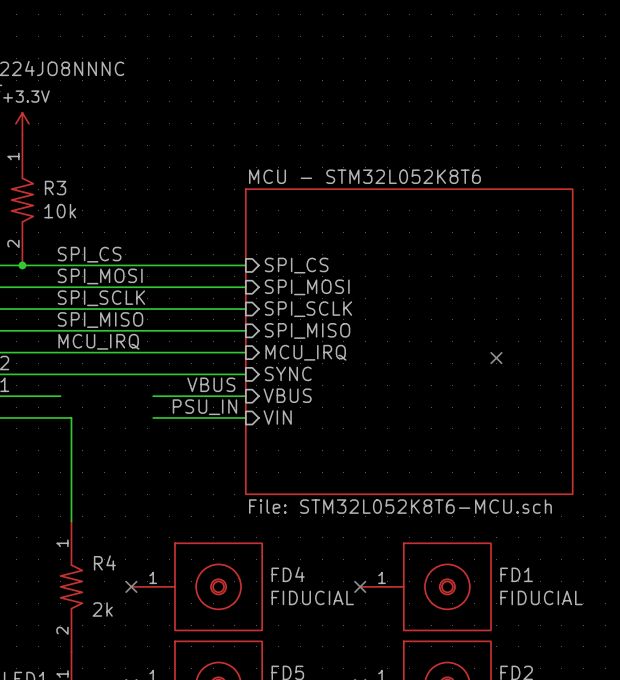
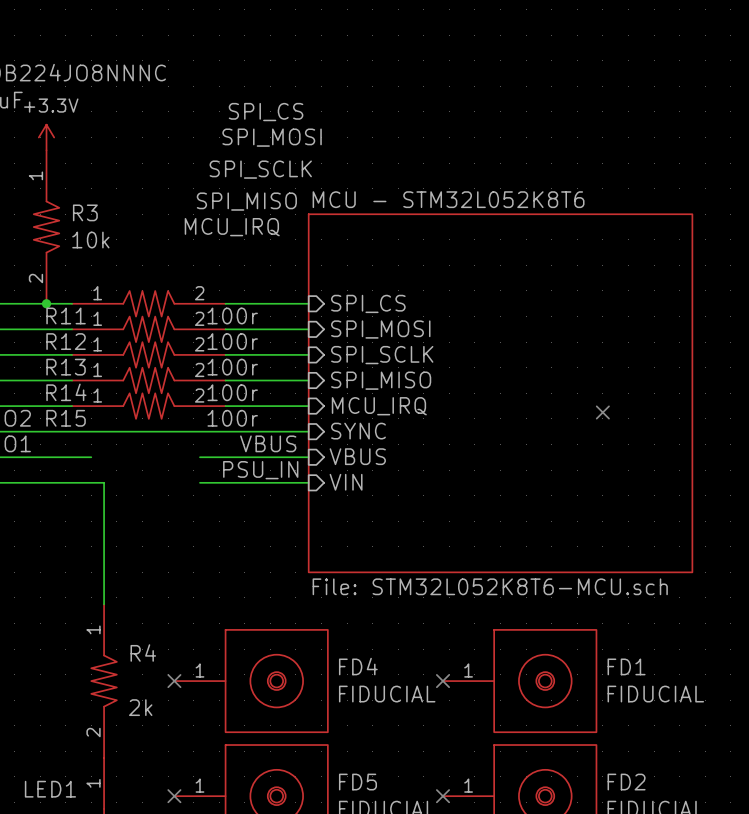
label position: SPI_CS (89, 254) -> SPI_CS (266, 112)
R11: none -> (148, 303)
label position: SPI_MOSI (100, 276) -> SPI_MOSI (272, 137)
R12: none -> (148, 329)
label position: SPI_SCLK (101, 298) -> SPI_SCLK (260, 169)
R13: none -> (148, 354)
label position: SPI_MISO (100, 320) -> SPI_MISO (246, 201)
R14: none -> (148, 380)
label position: MCU_IRQ (98, 341) -> MCU_IRQ (232, 227)
R15: none -> (148, 406)

